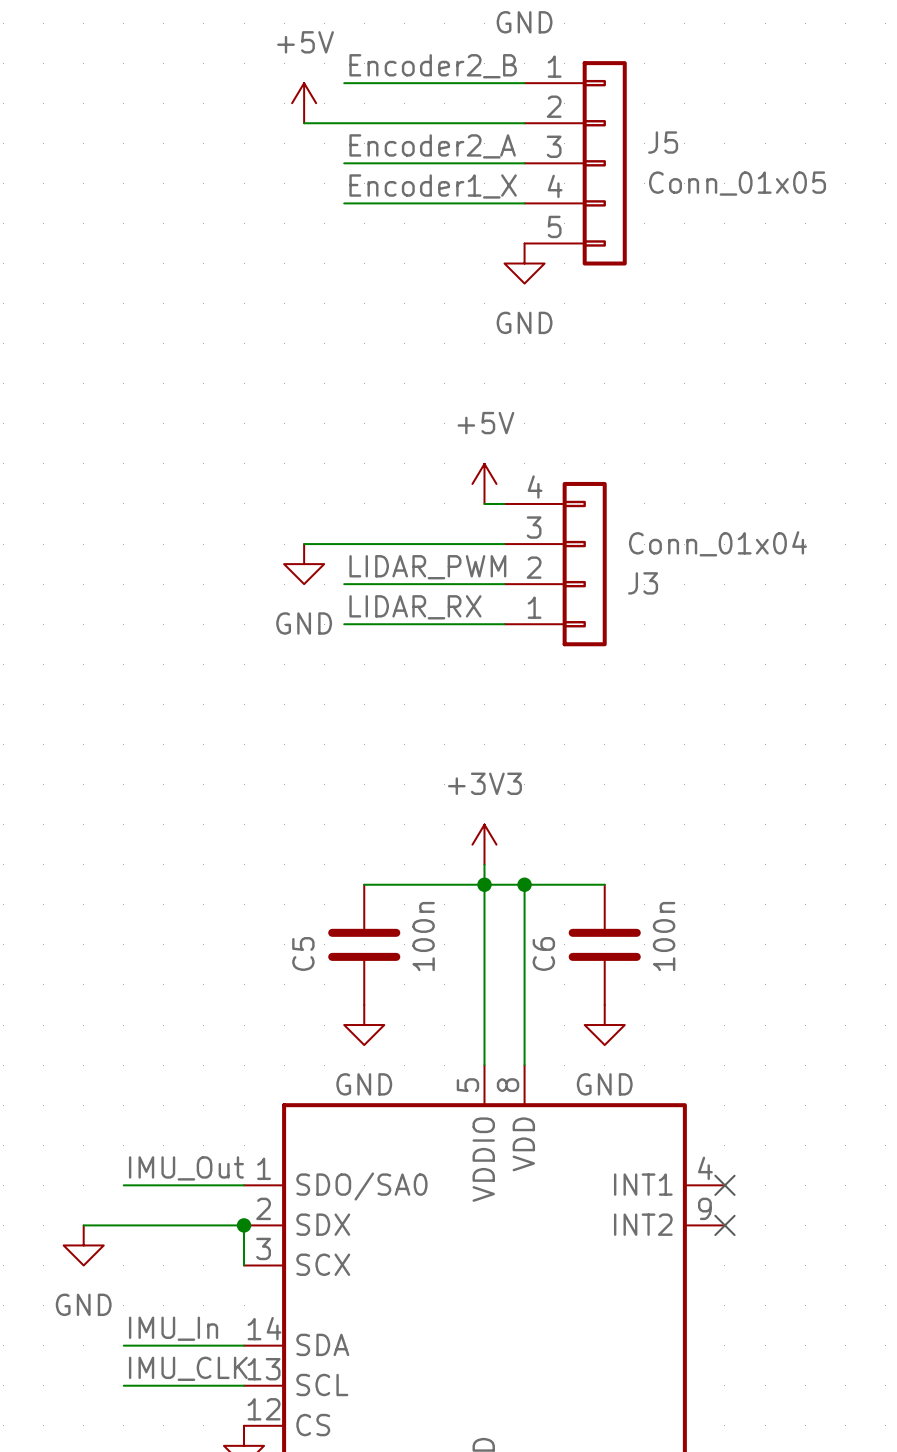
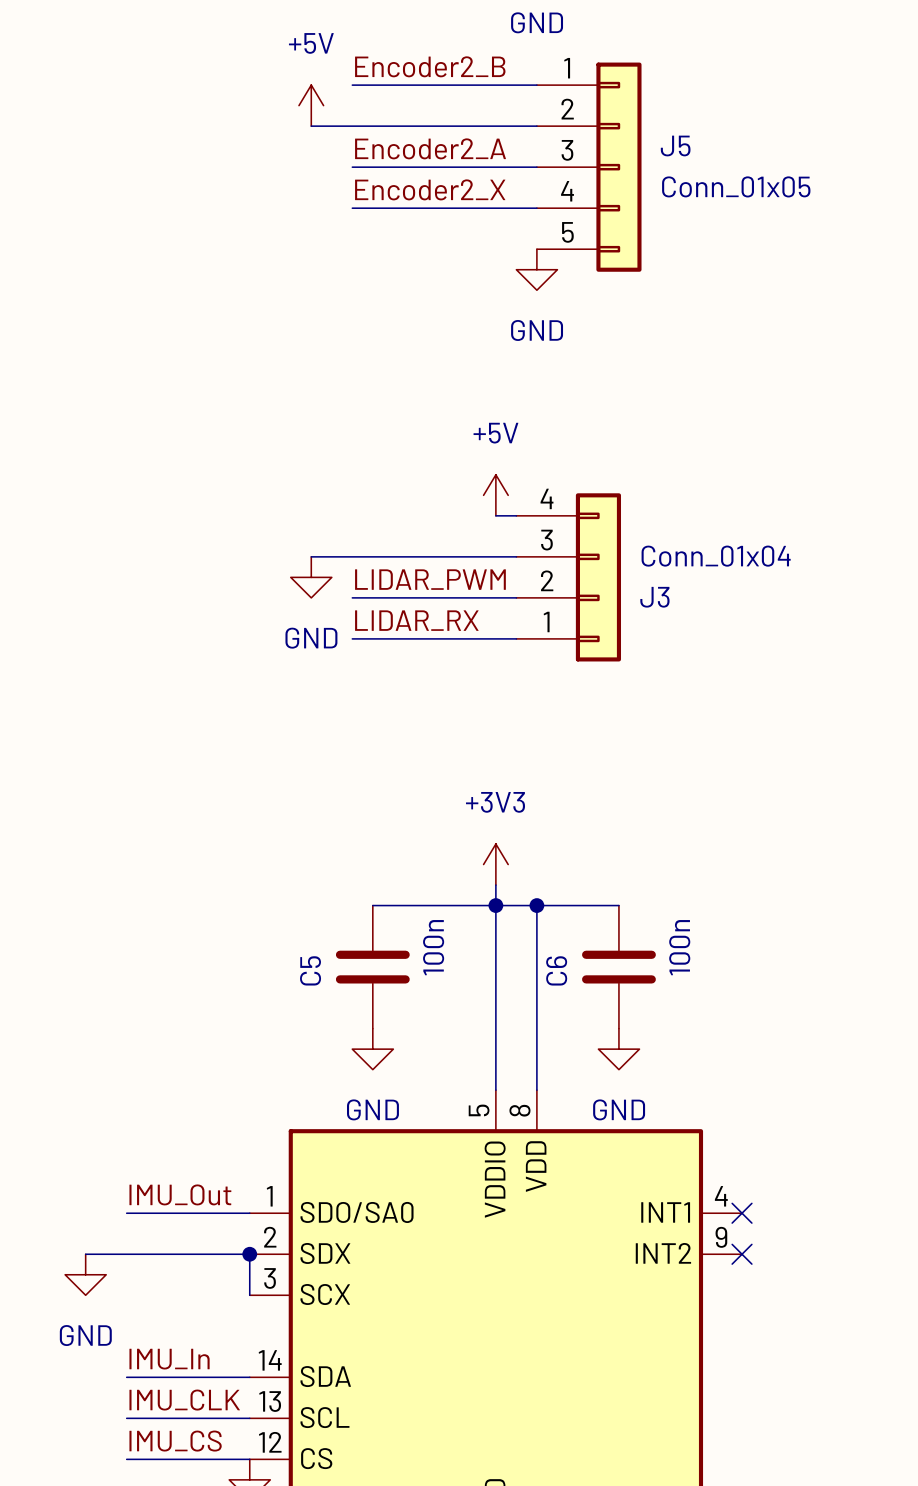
label: Encoder1_X (433, 186) -> Encoder2_X (430, 189)
label: none -> IMU_CS (175, 1441)
wire: none -> (126, 1459) (249, 1459)

